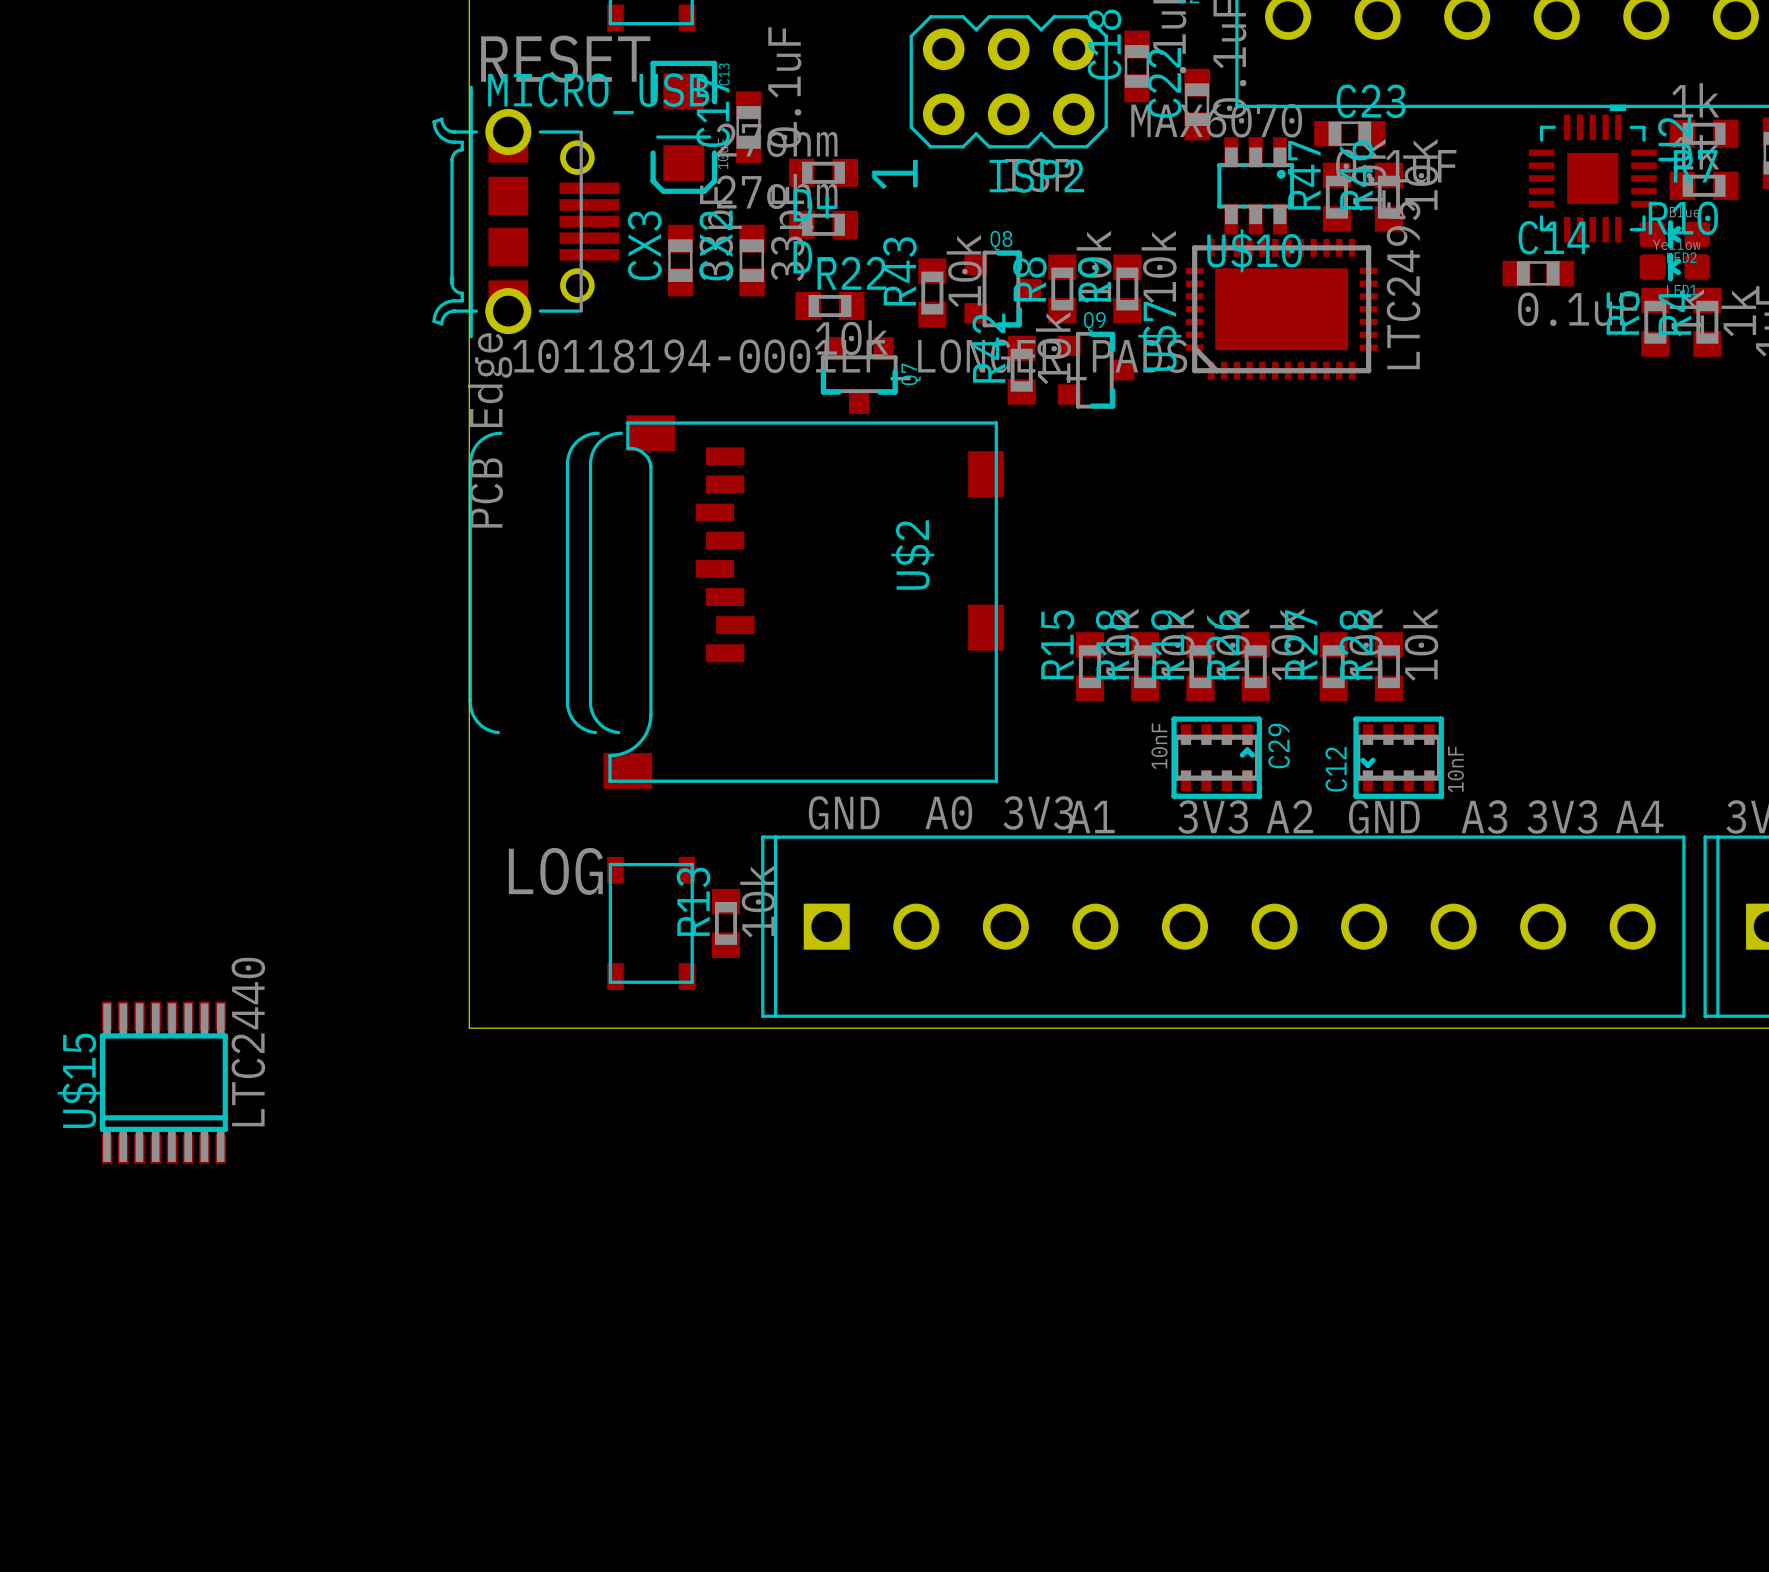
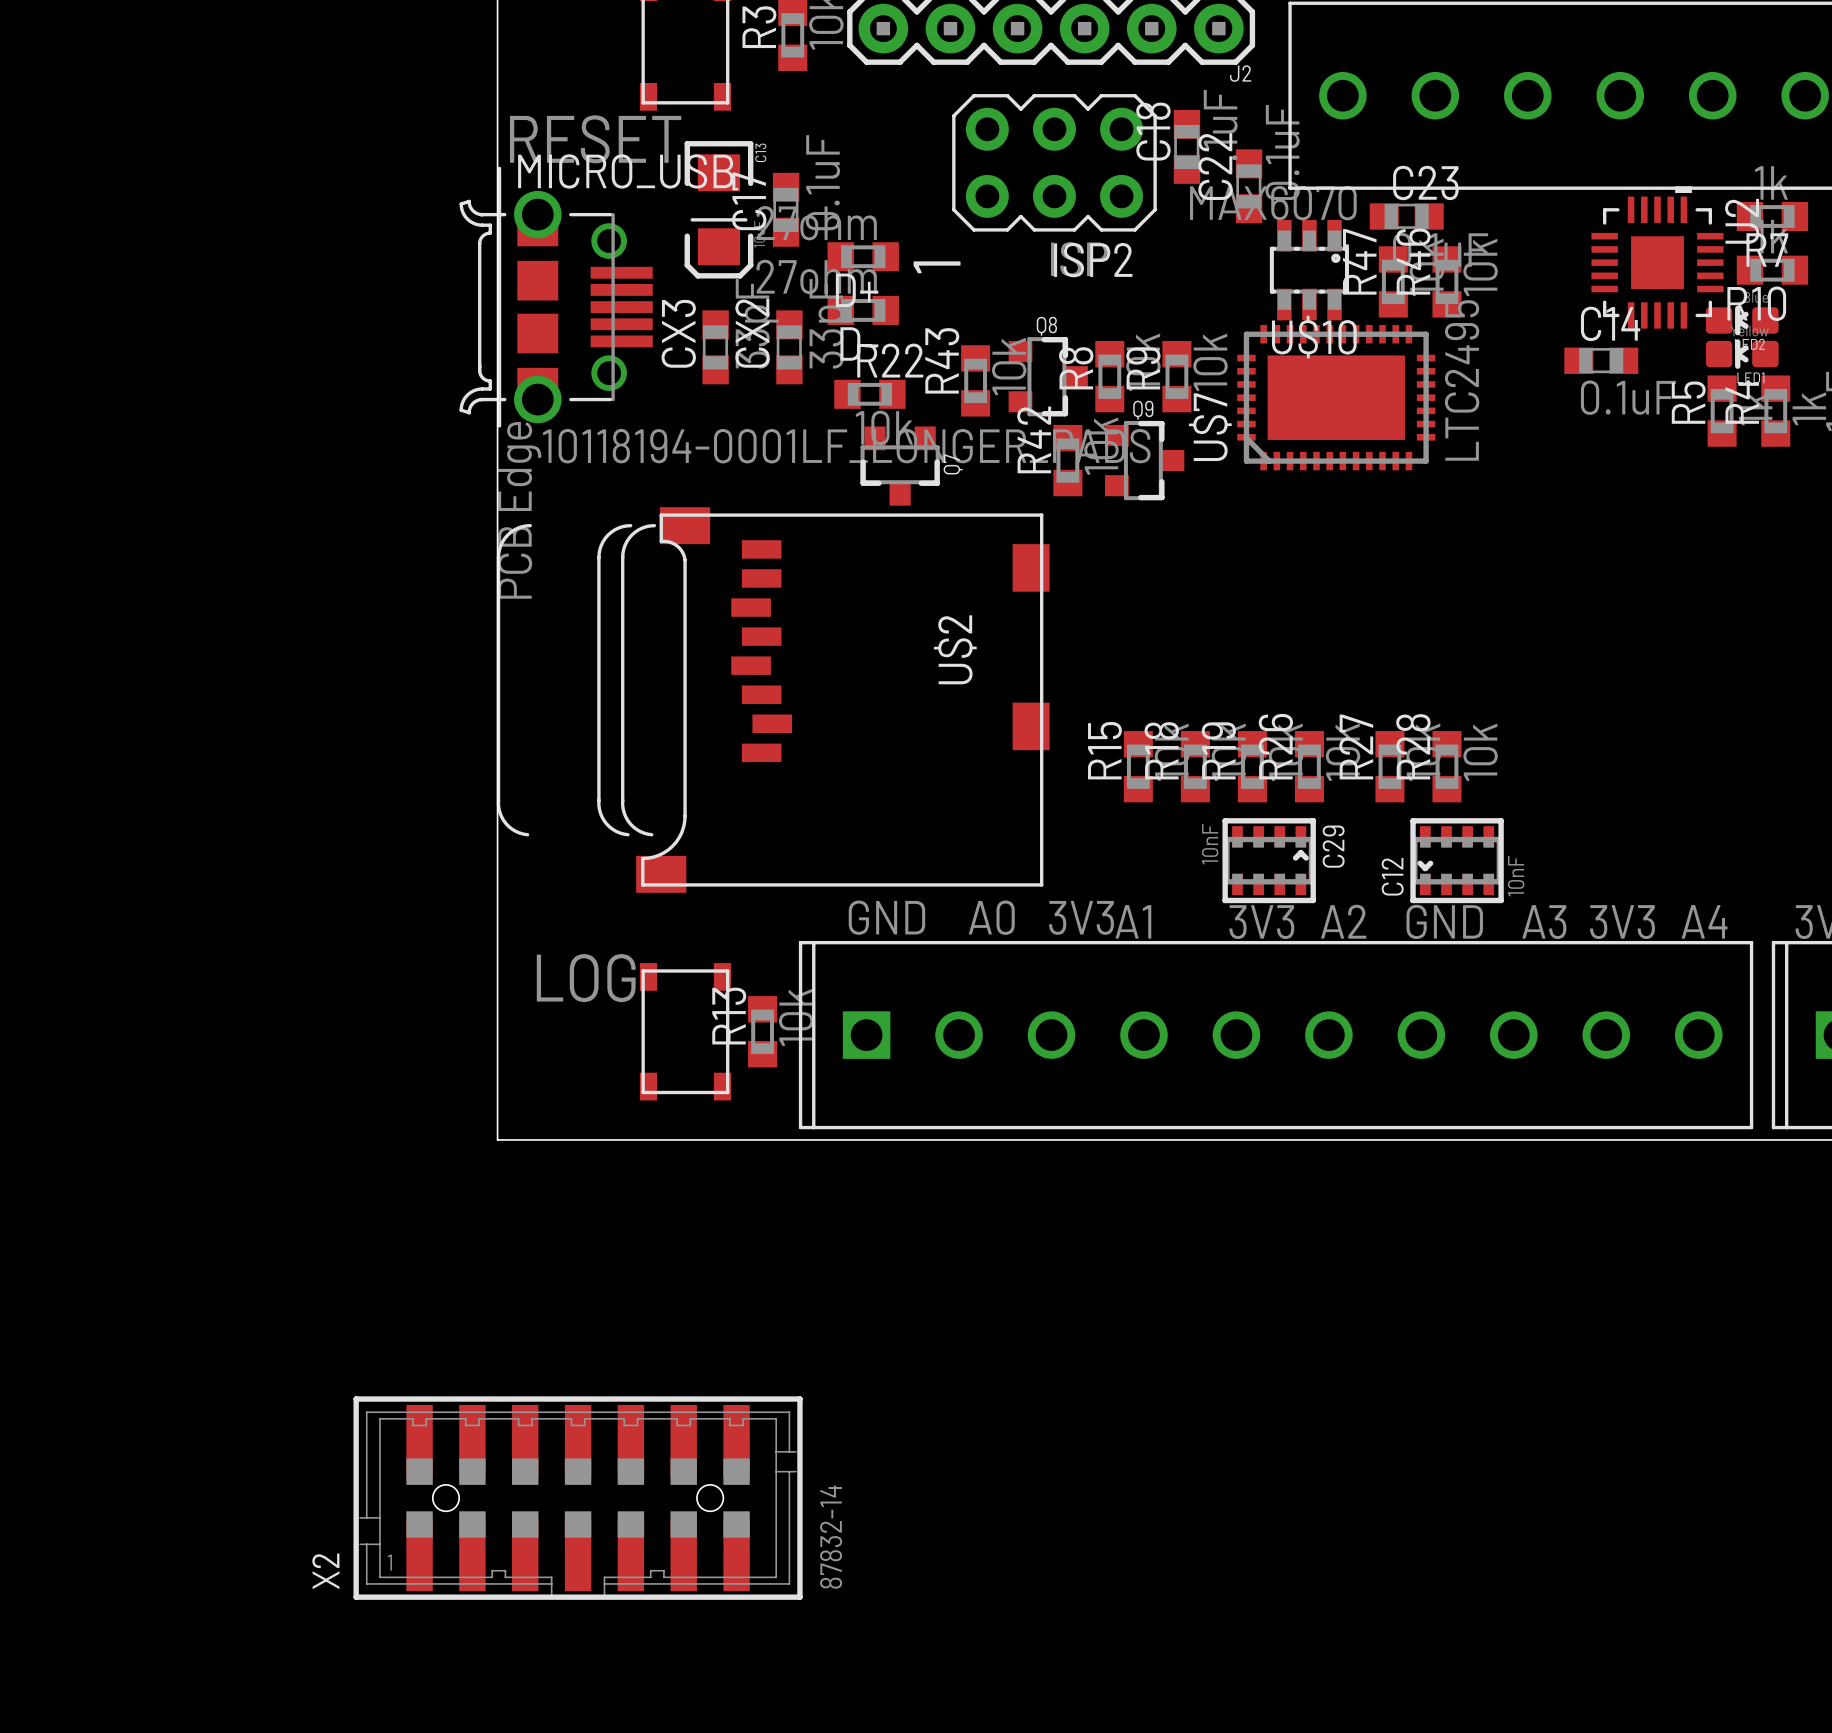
U$15: LTC2440 (163, 1082) -> none
X2: none -> 87832-14 (578, 1498)

